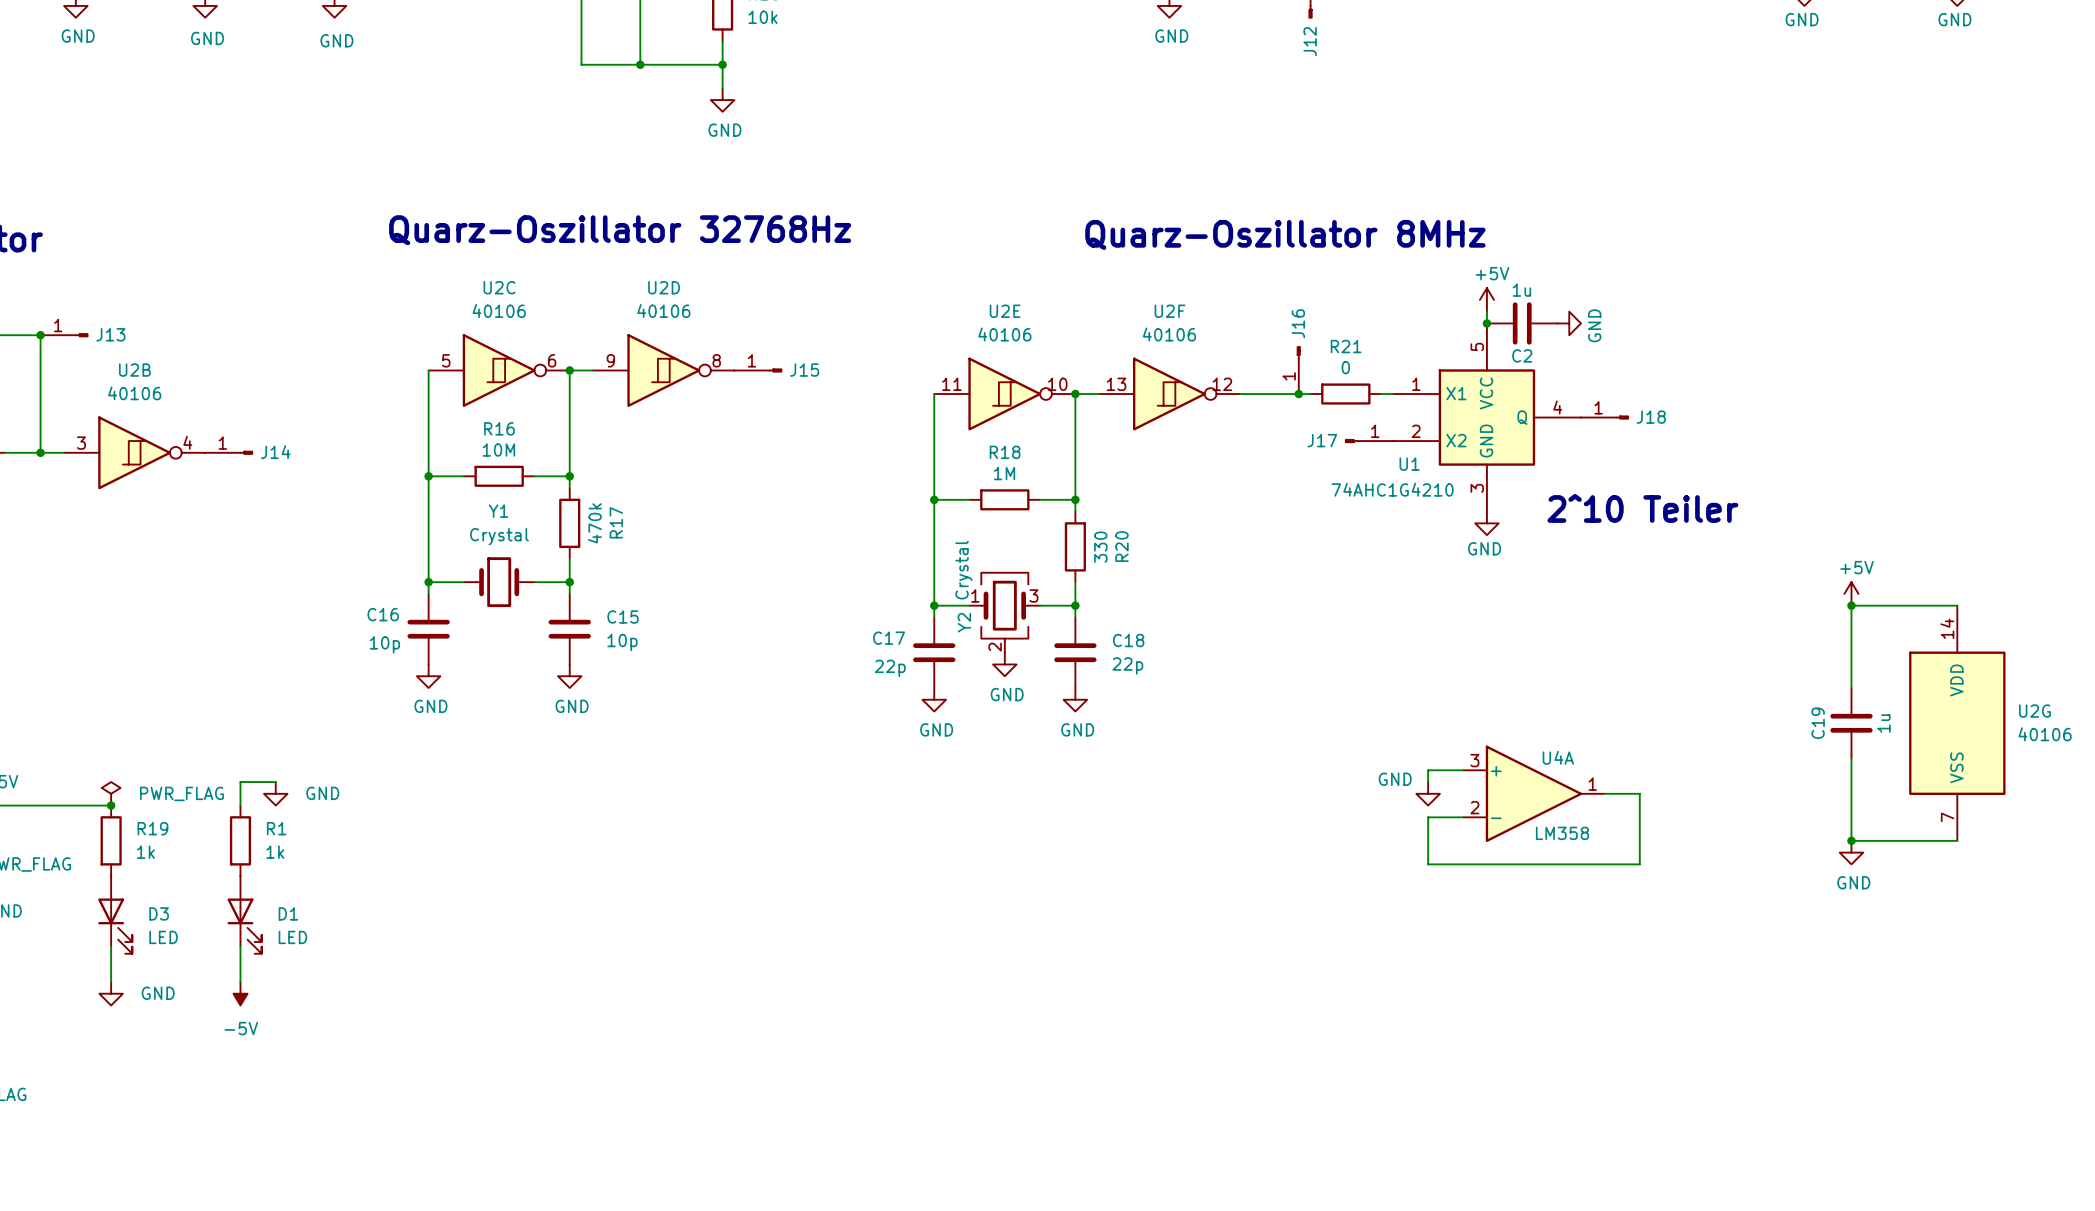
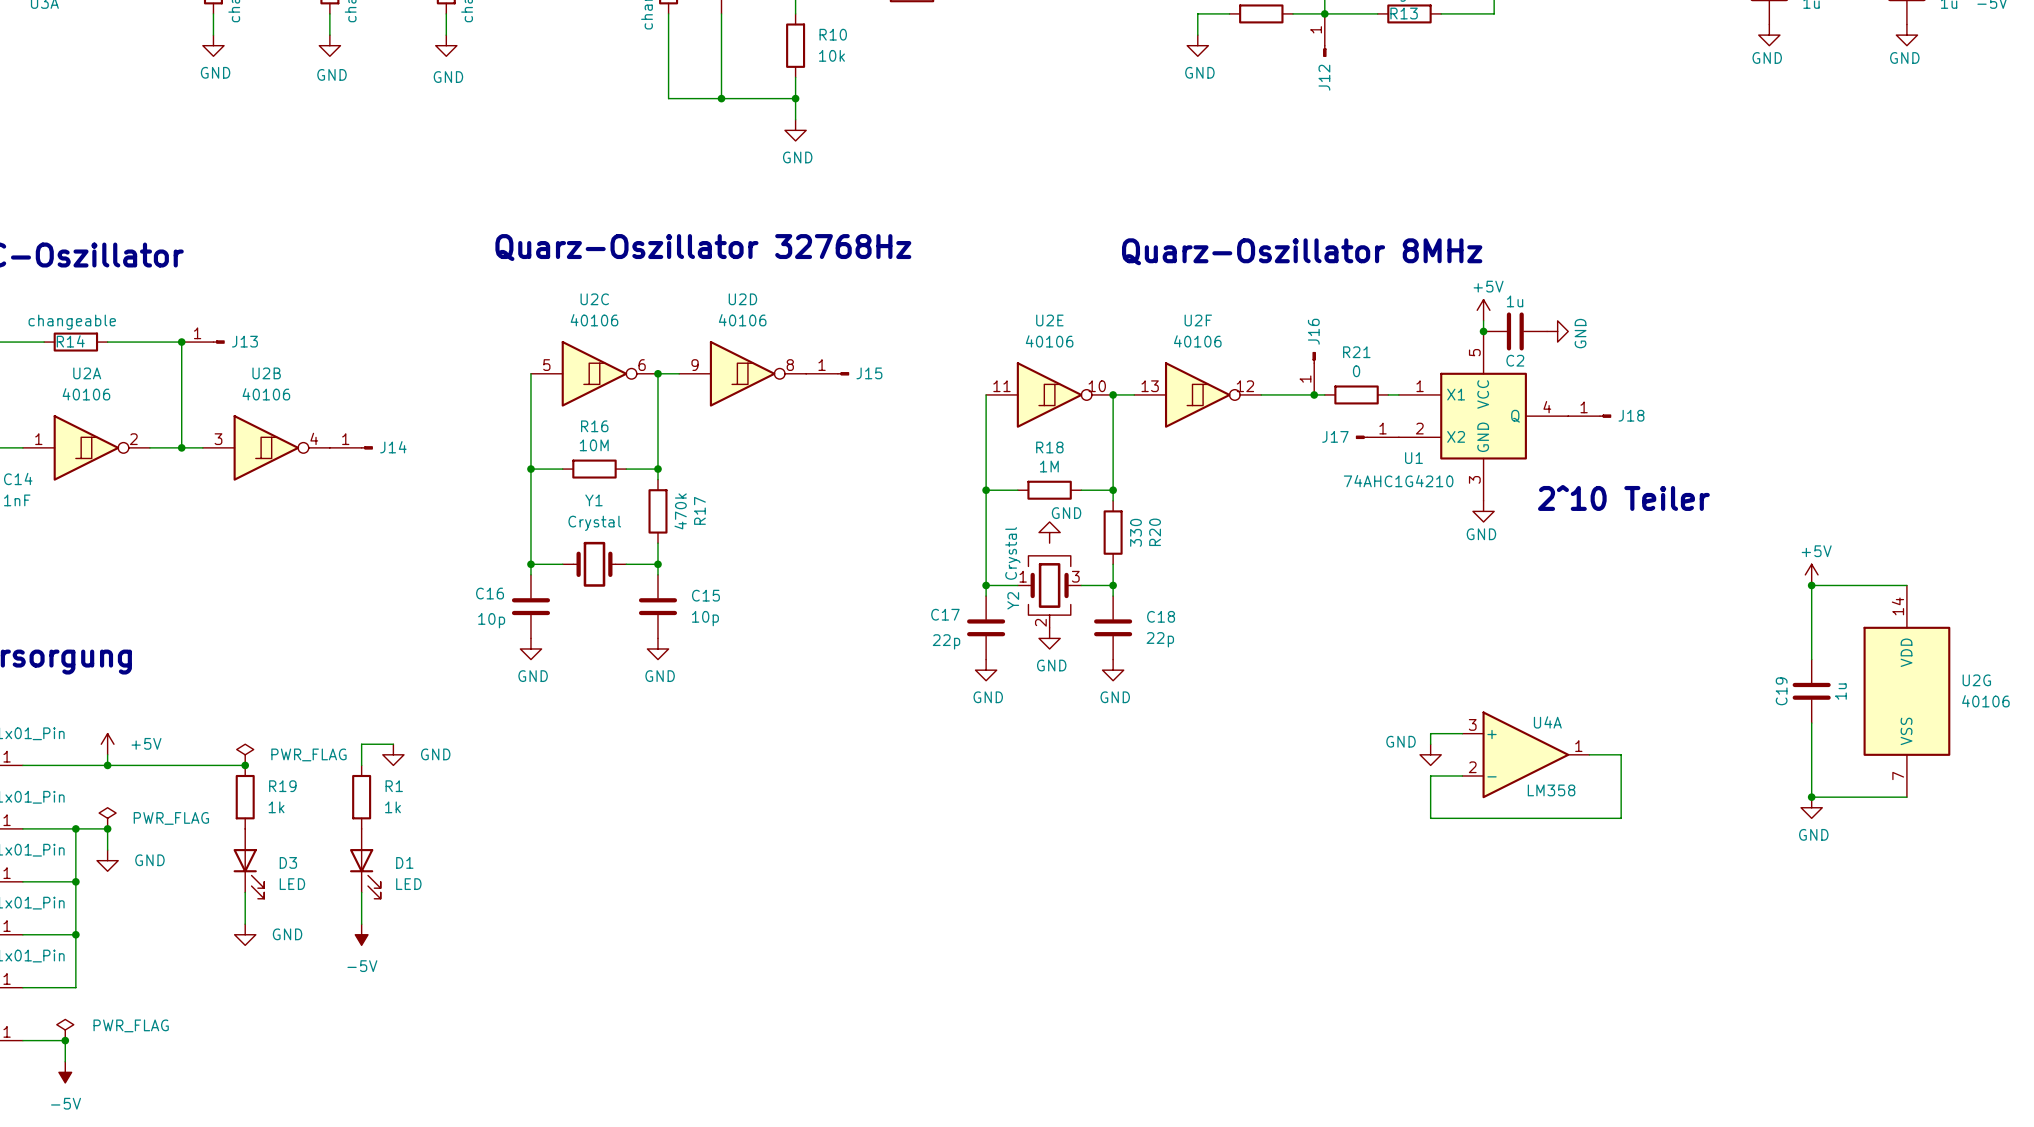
power symbol: none -> GND (1049, 532)

